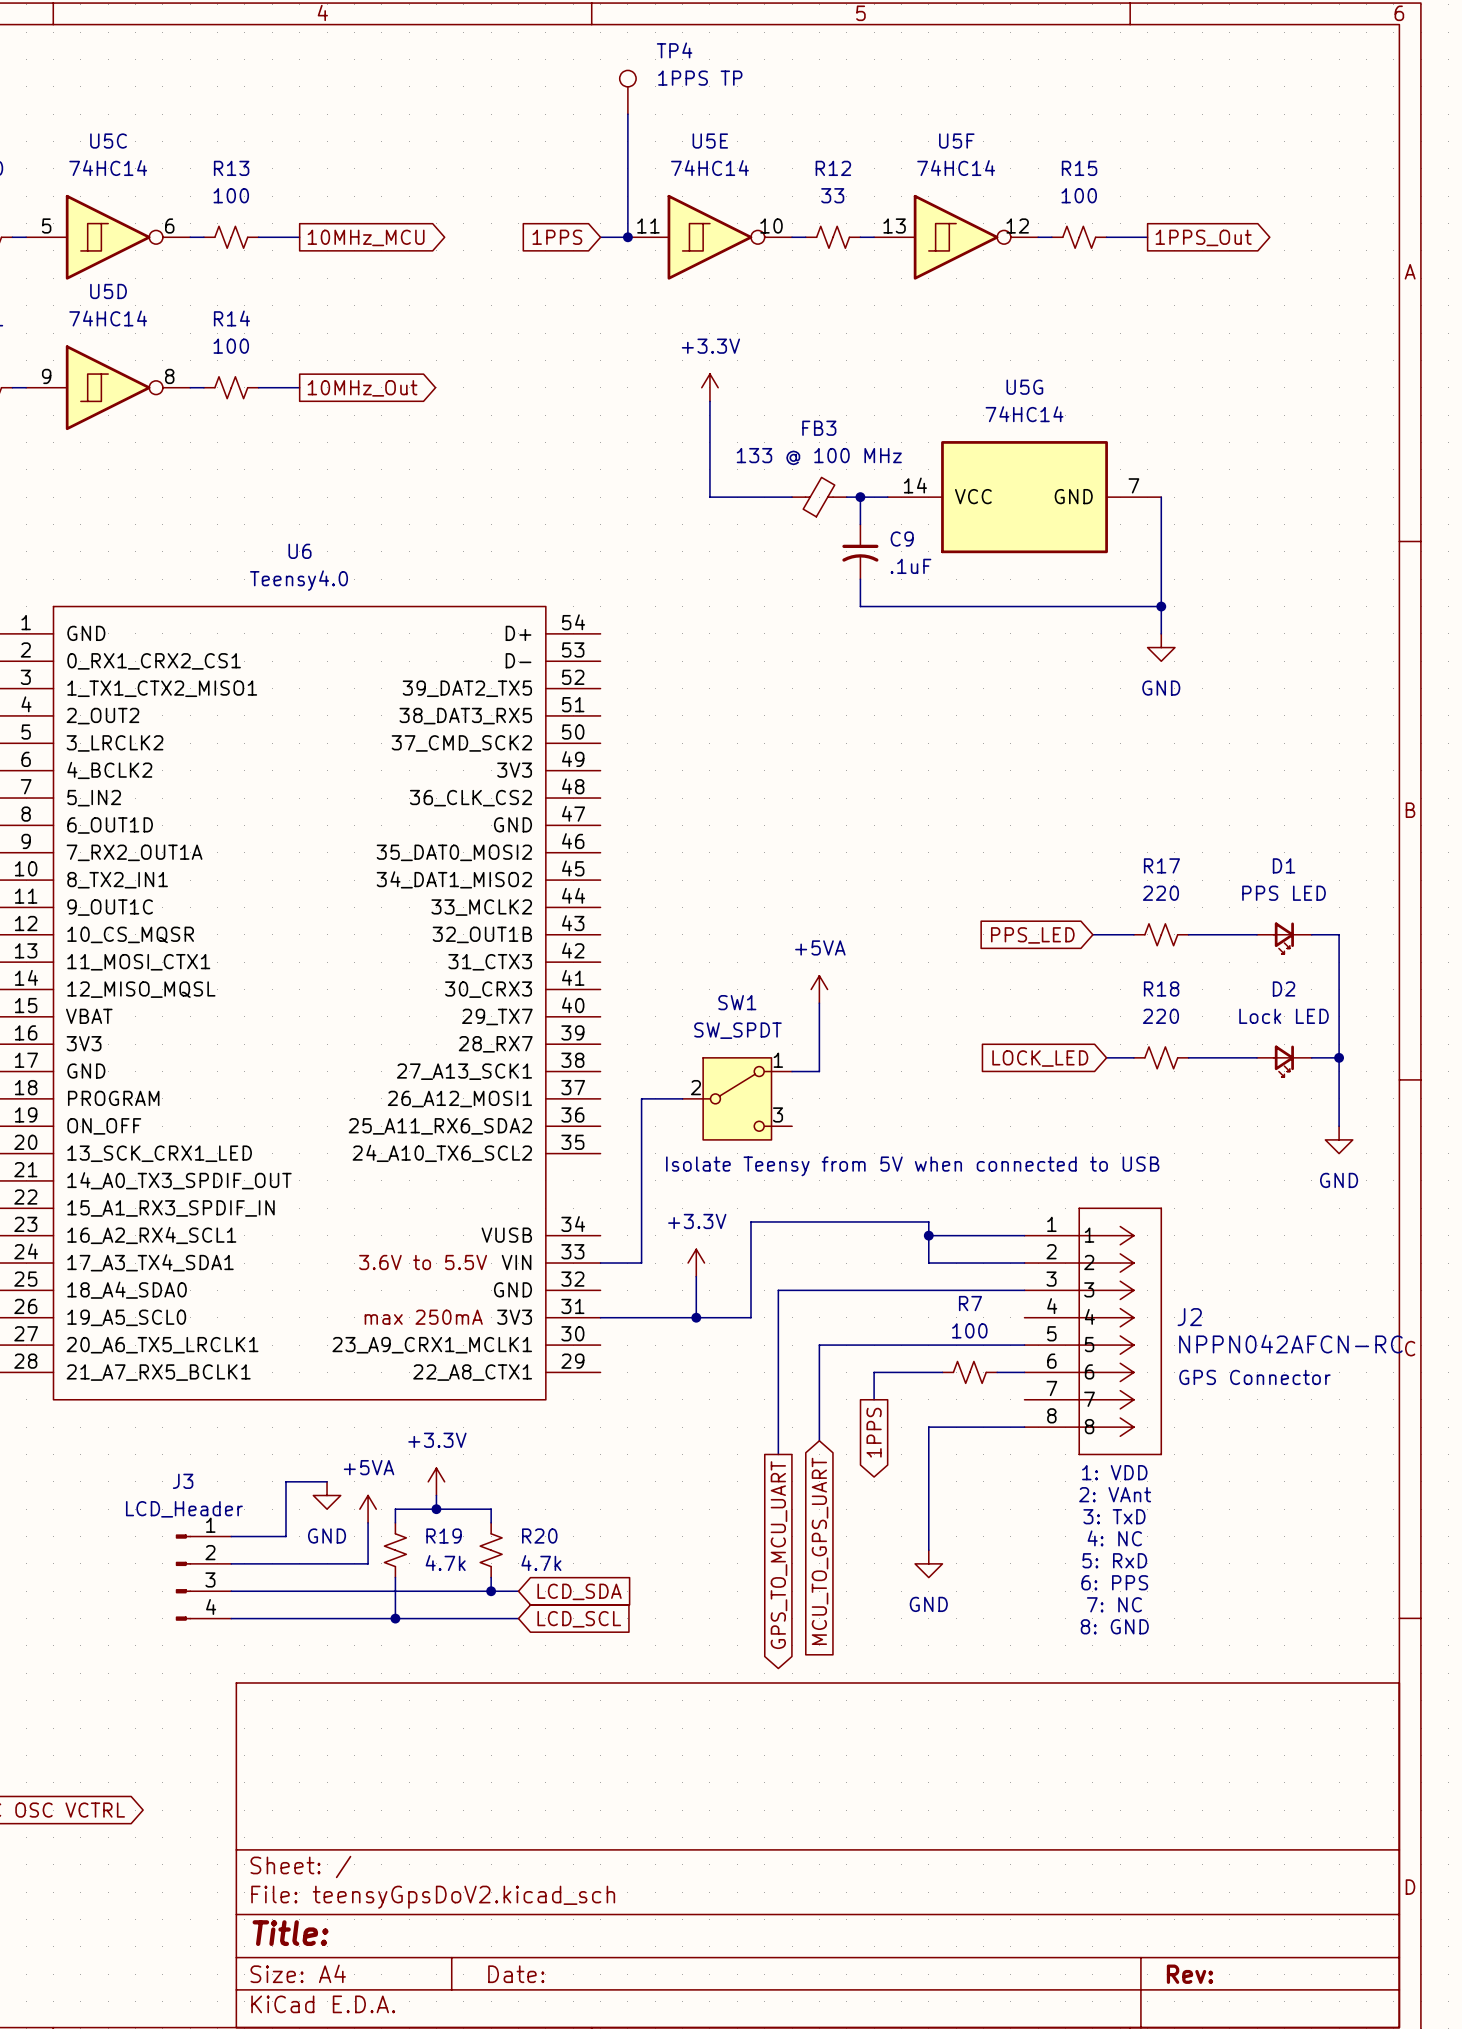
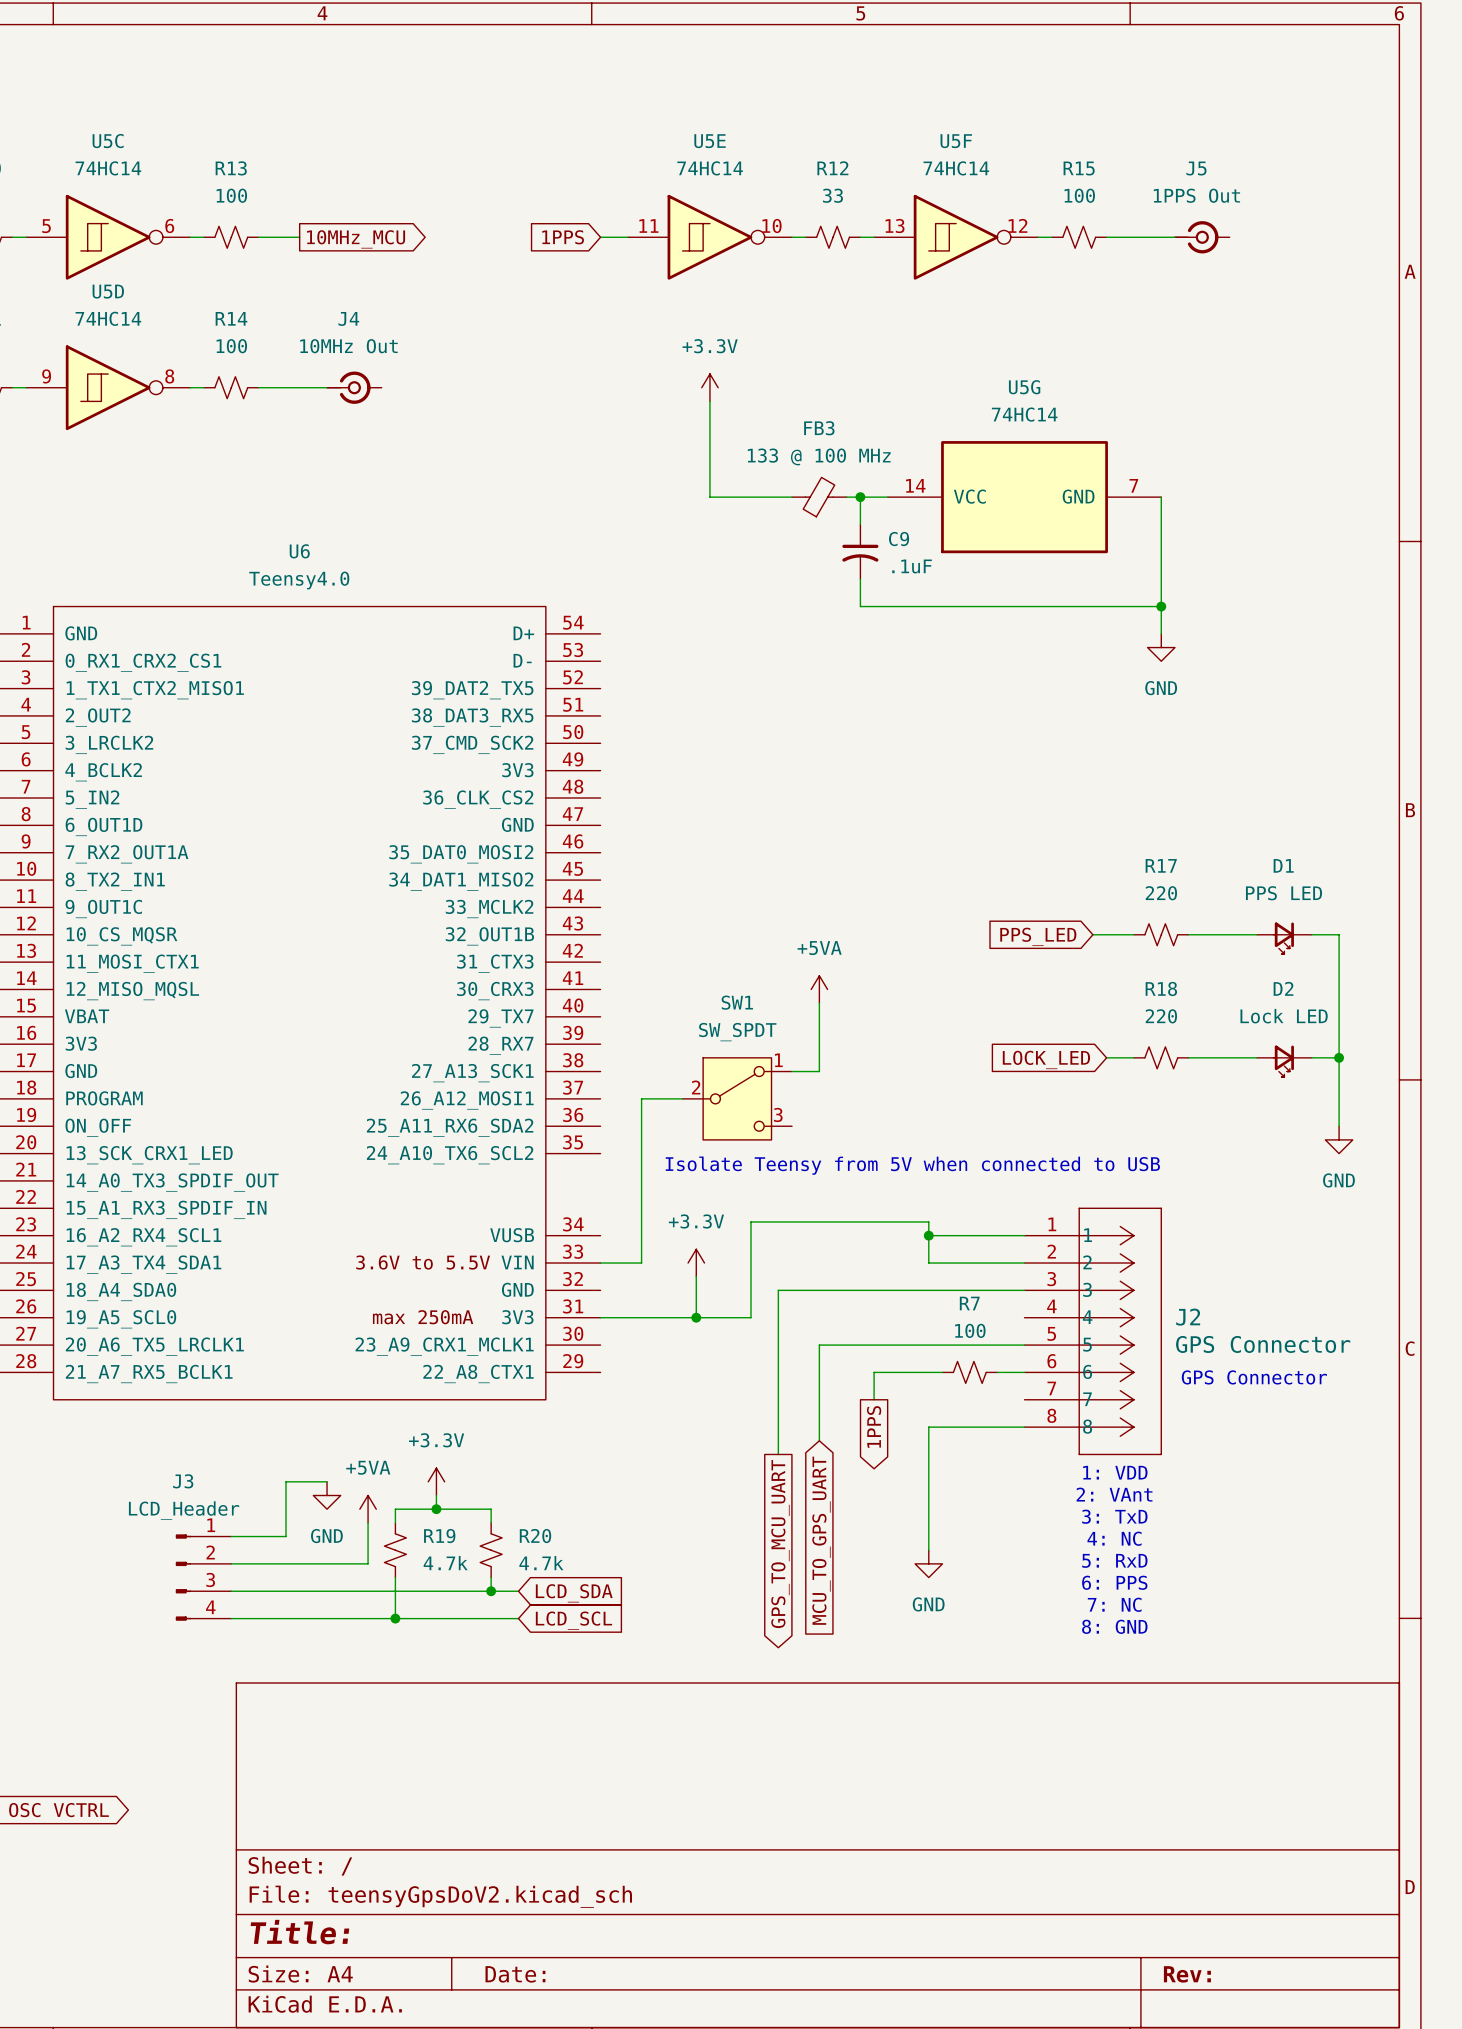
TP4: 1PPS TP (627, 92) -> none
wire: (627, 114) (627, 237) -> none
junction: (627, 237) -> none
wire: none -> (1147, 237) (1174, 237)
J5: none -> 1PPS Out (1202, 237)
global label: 1PPS_Out (1203, 237) -> none
wire: none -> (299, 387) (327, 387)
J4: none -> 10MHz Out (354, 387)
global label: 10MHz_Out (362, 388) -> none
J2 value: NPPN042AFCN-RC (1290, 1344) -> GPS Connector (1263, 1344)

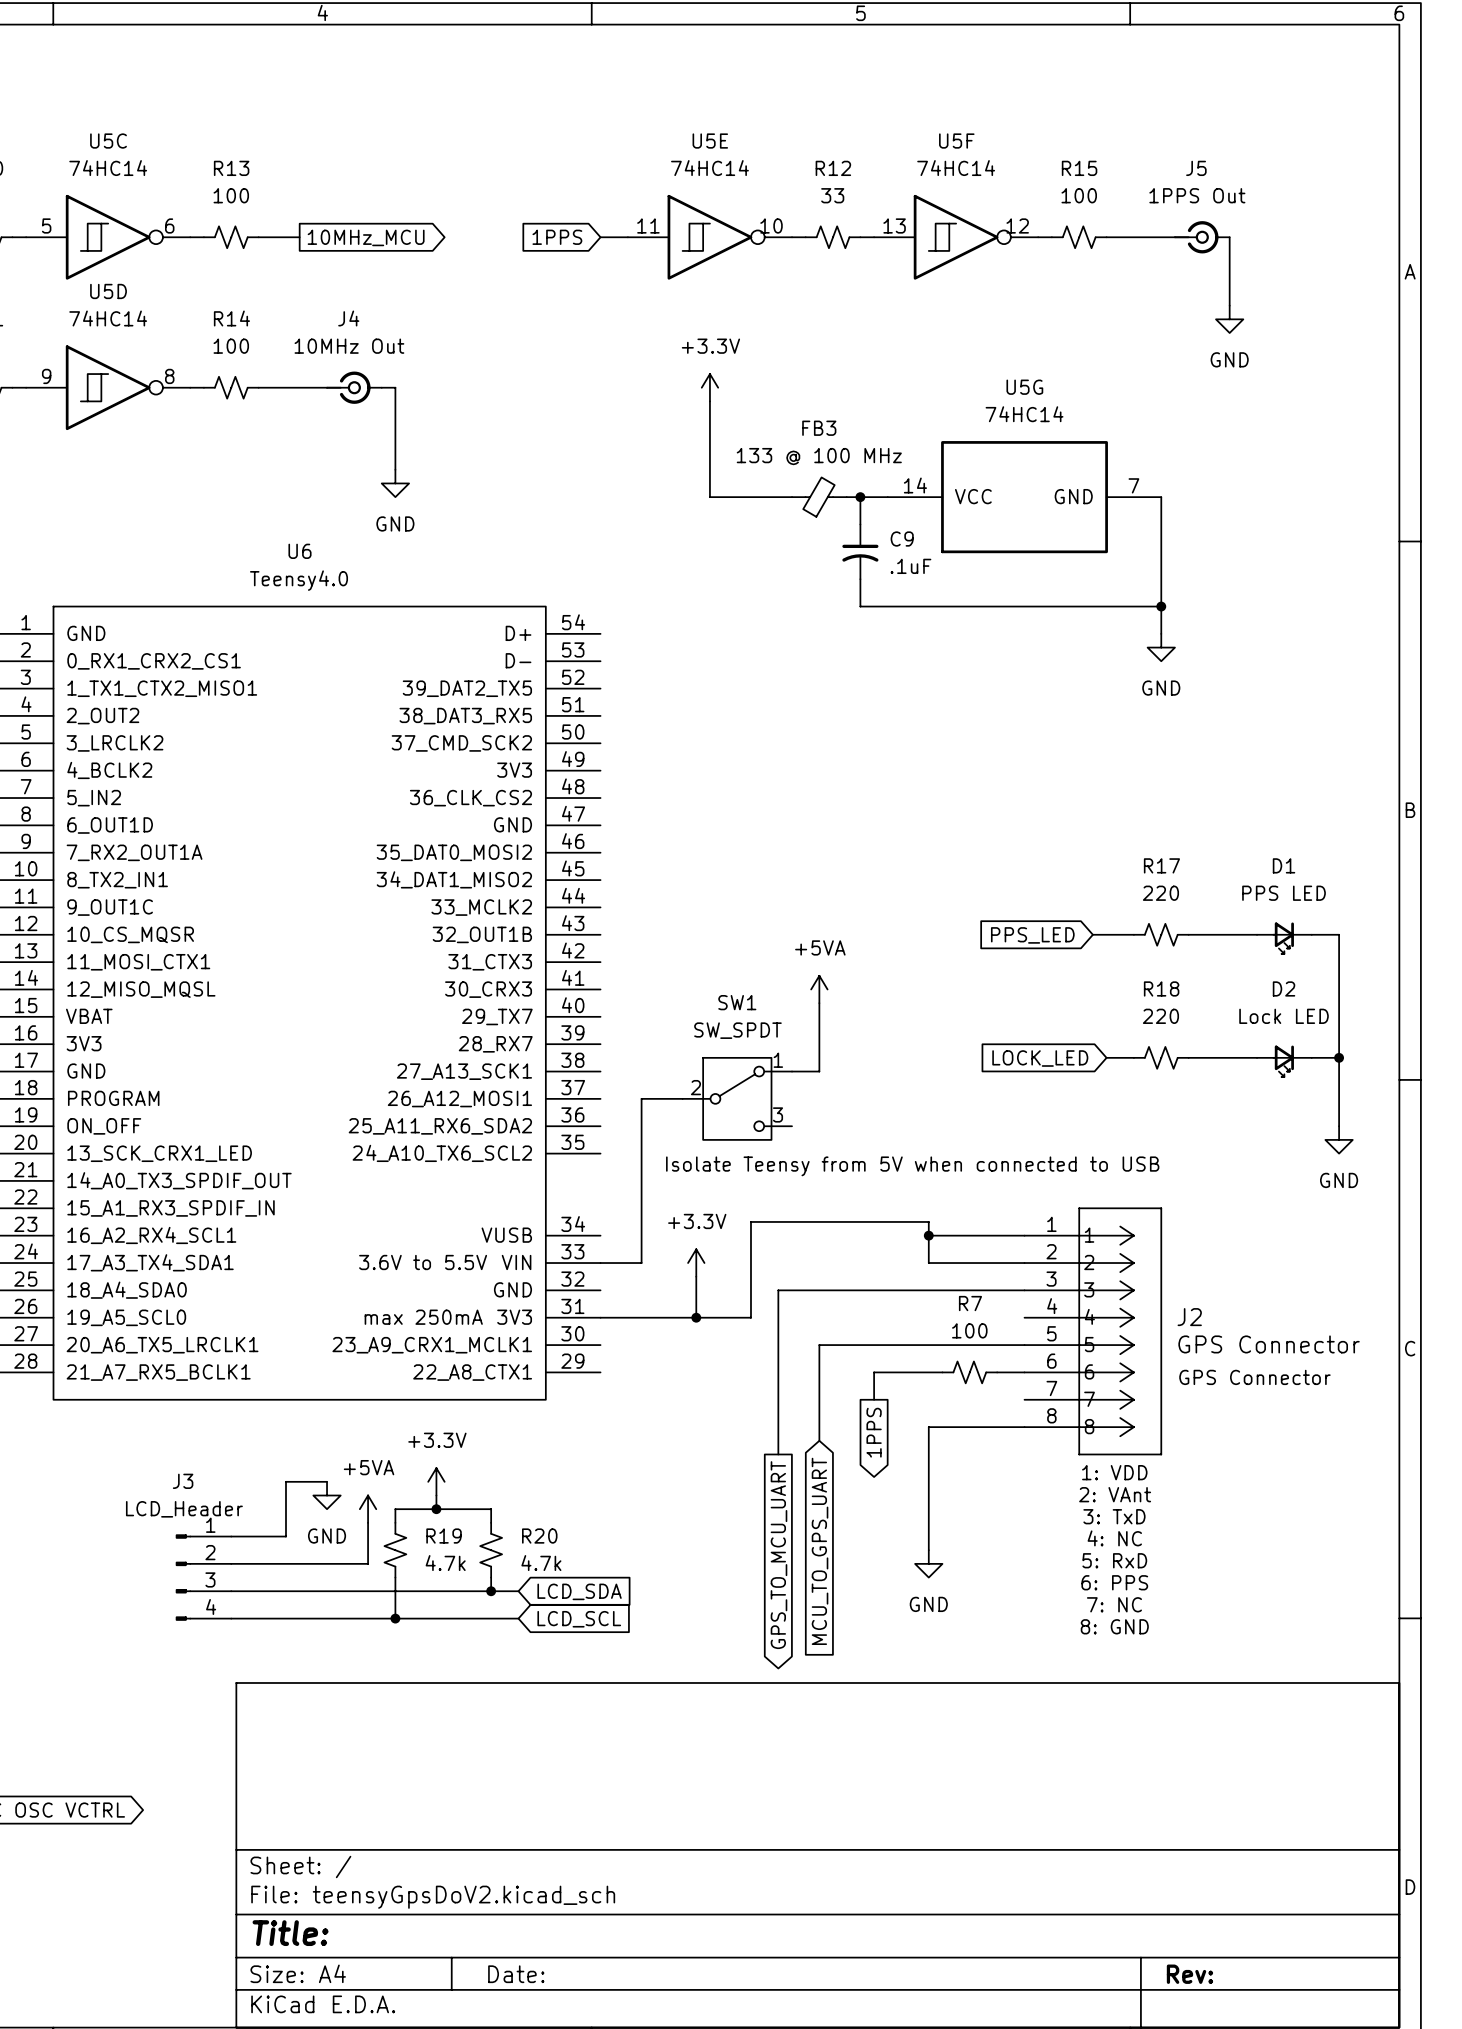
wire: none -> (1229, 237) (1229, 305)
power symbol: none -> GND (1229, 319)
wire: none -> (381, 387) (395, 387) (395, 469)
power symbol: none -> GND (395, 483)

